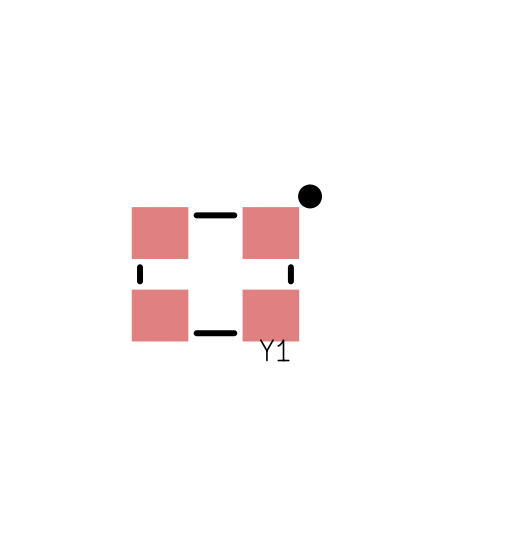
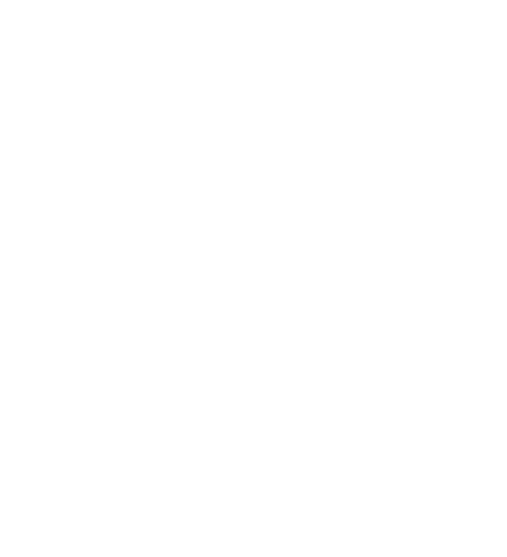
Y1: (226, 262) -> none

